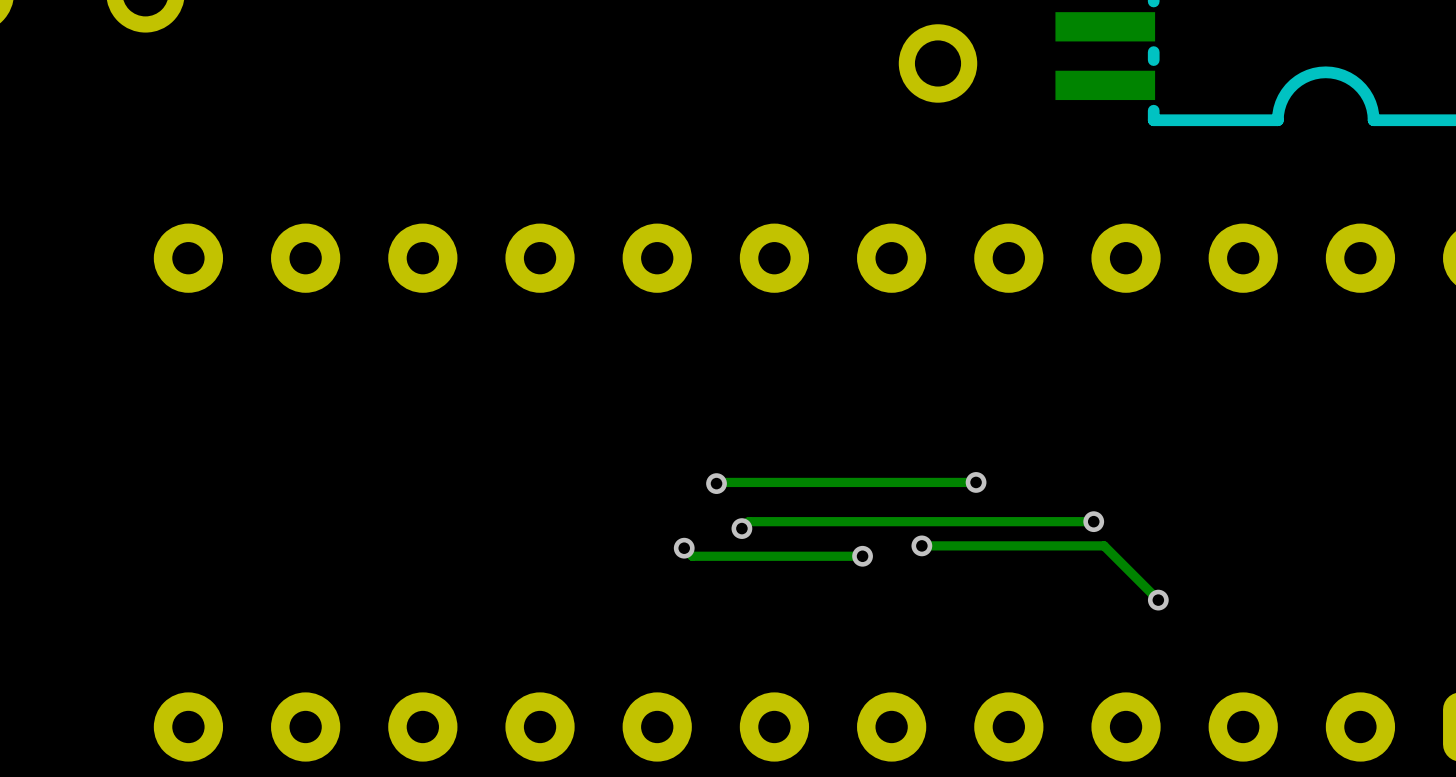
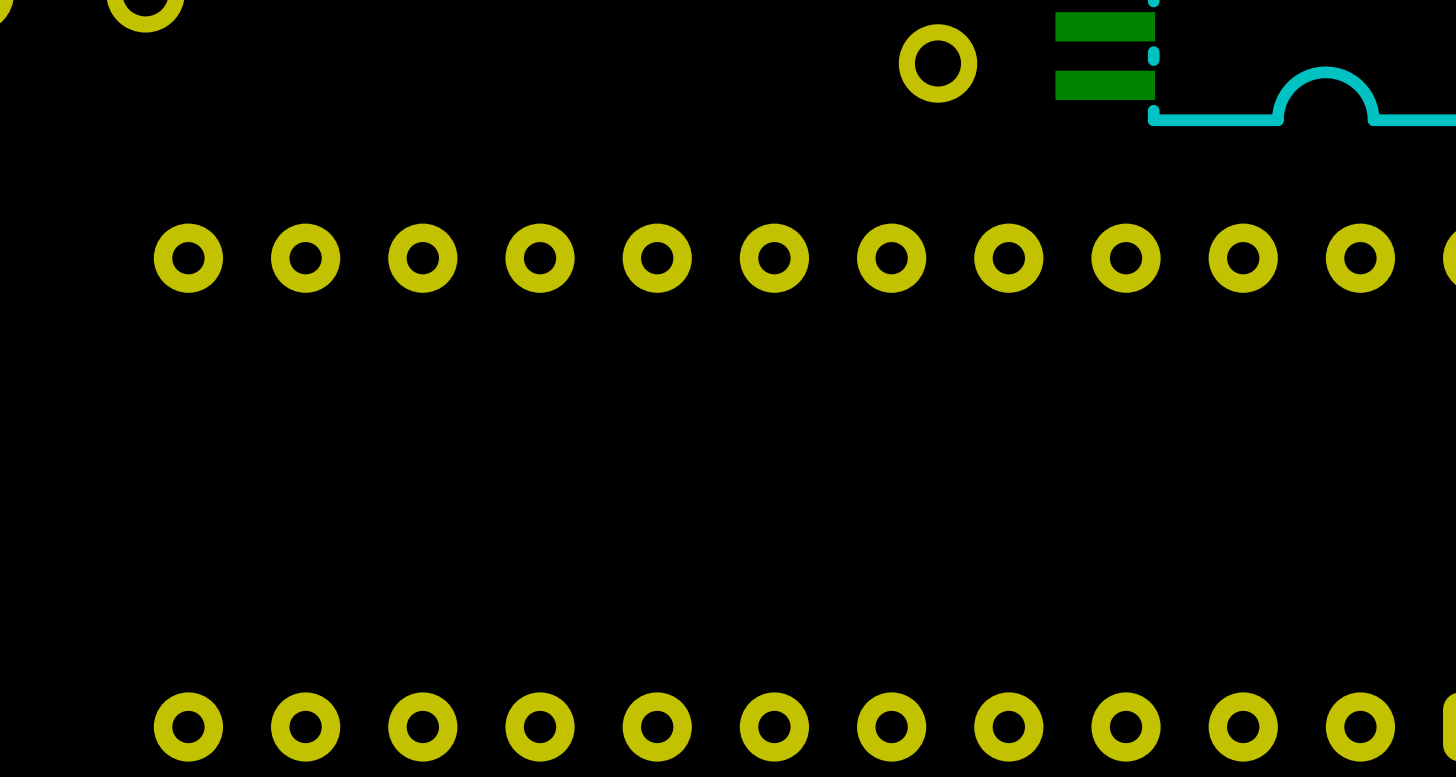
track: (976, 482) (716, 483) -> none
via: (976, 482) -> none
via: (716, 483) -> none
track: (1093, 521) (748, 521) (741, 528) -> none
via: (1093, 521) -> none
via: (741, 528) -> none
track: (921, 545) (1104, 545) (1158, 600) -> none
via: (921, 545) -> none
track: (684, 548) (692, 556) (862, 556) -> none
via: (684, 548) -> none
via: (862, 556) -> none
via: (1158, 600) -> none

